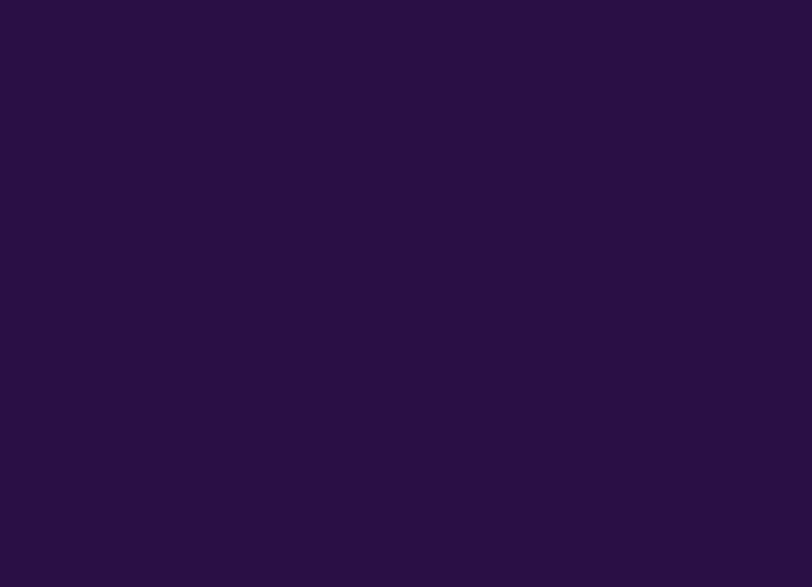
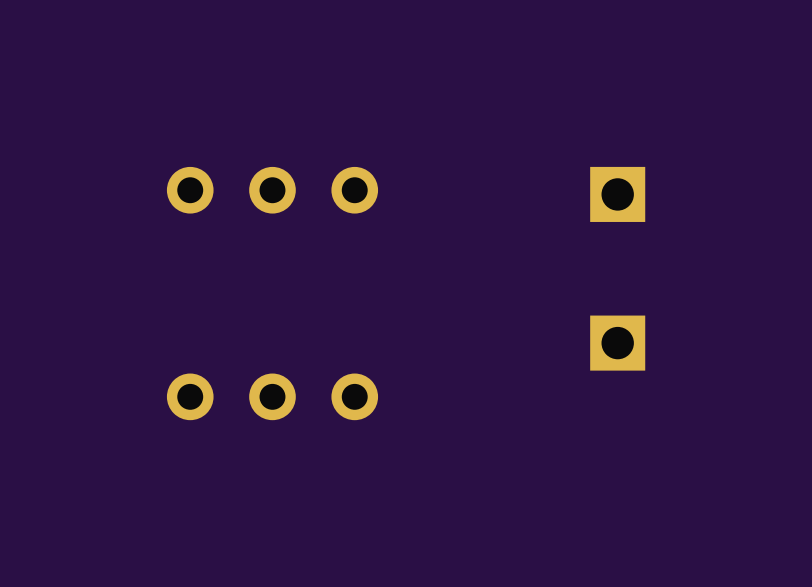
part: none -> (272, 190)
part: none -> (617, 194)
part: none -> (617, 343)
part: none -> (272, 396)

